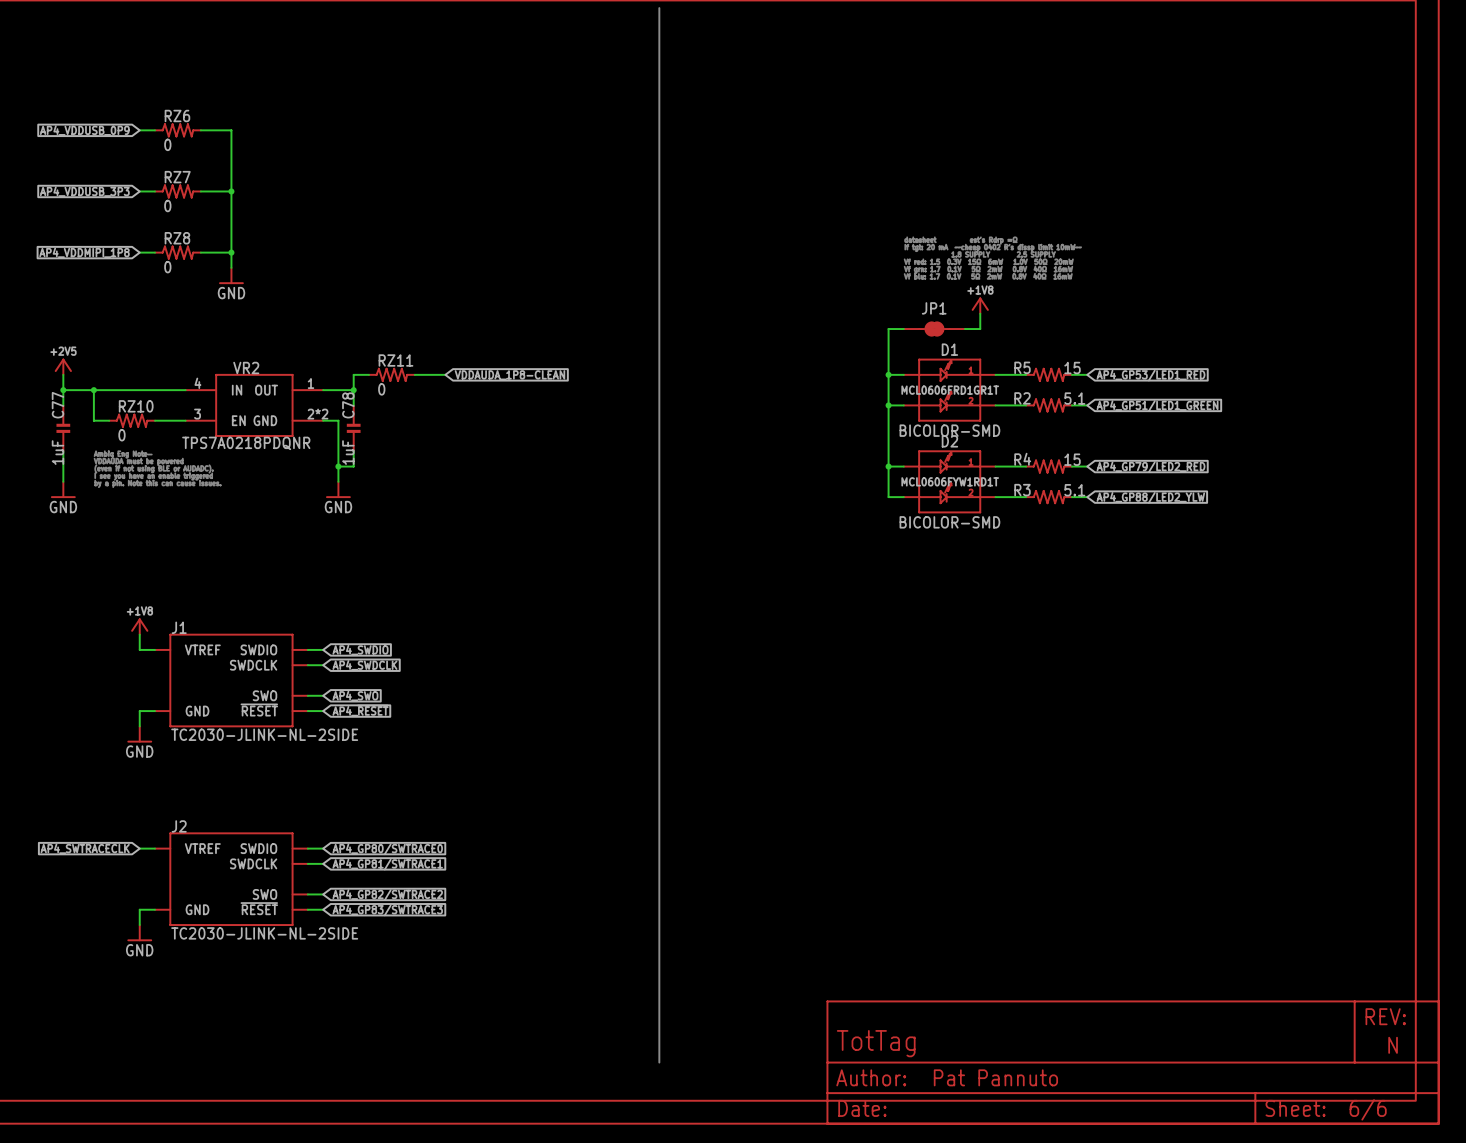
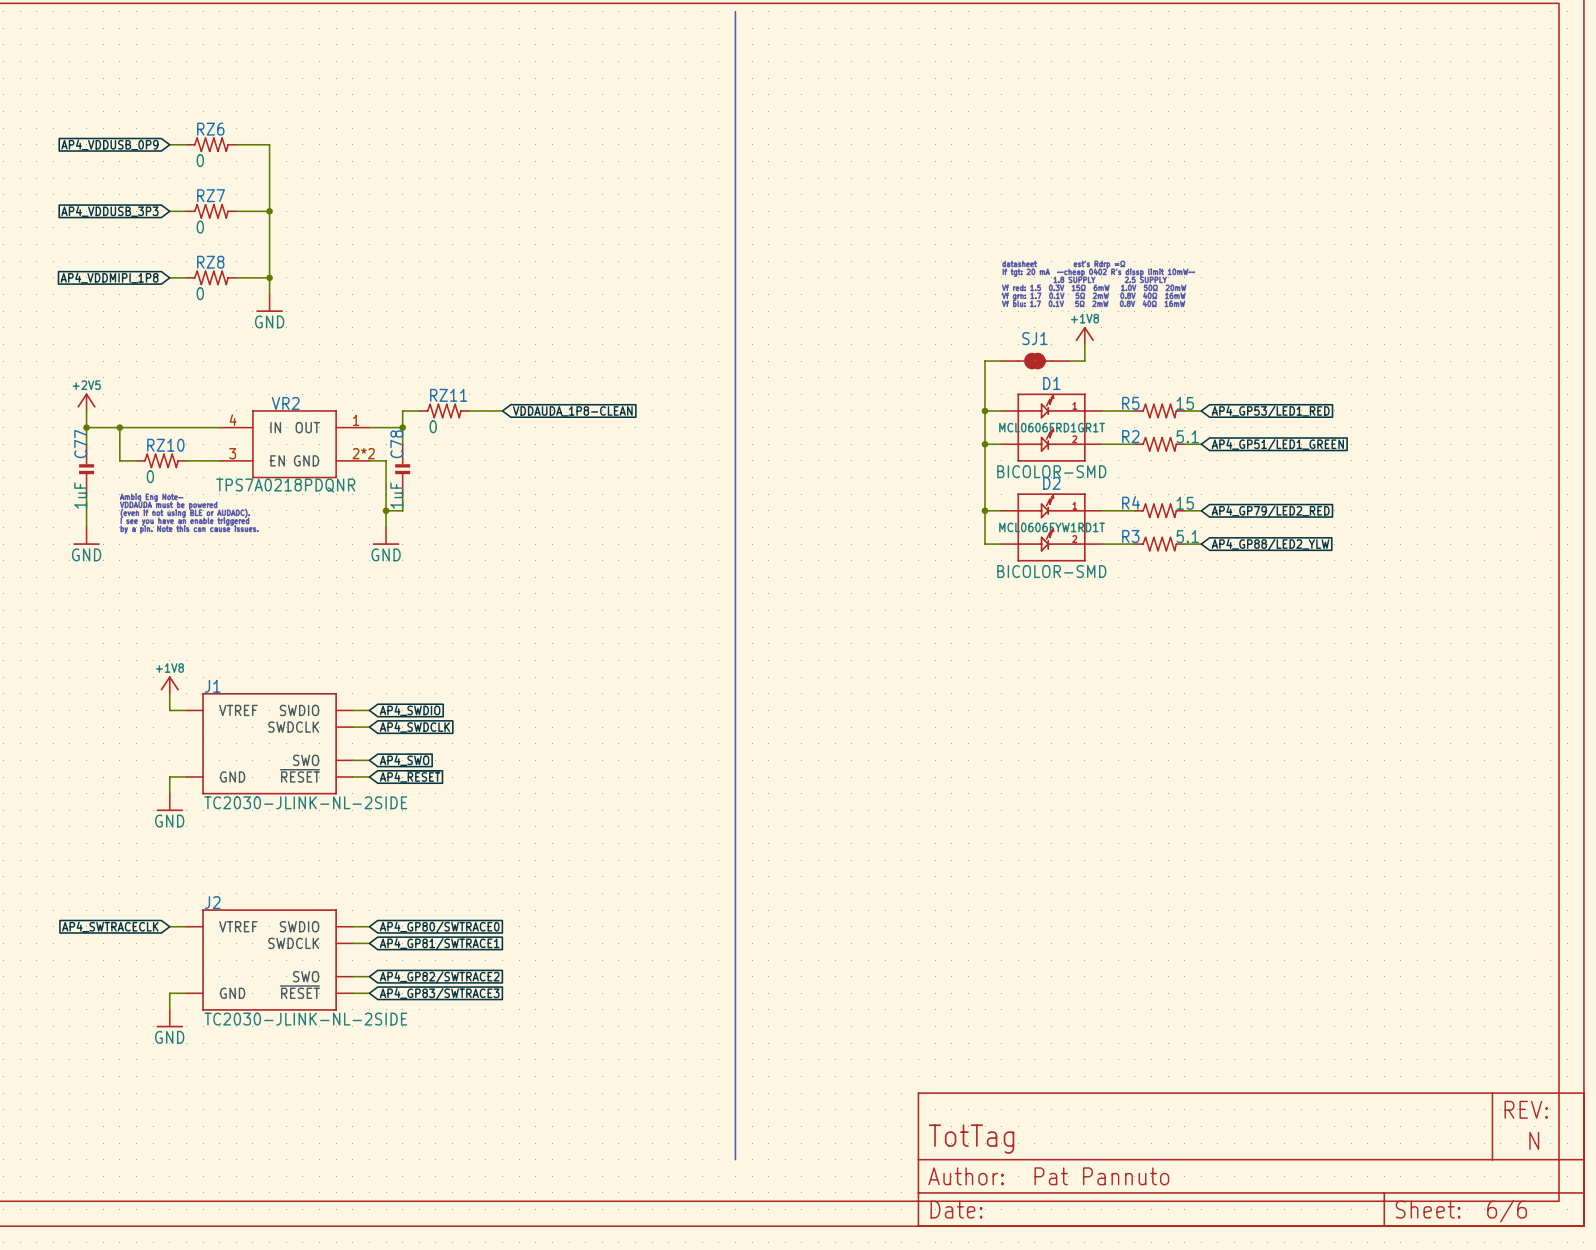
JP1 name: JP1 (934, 308) -> SJ1 (1034, 338)

